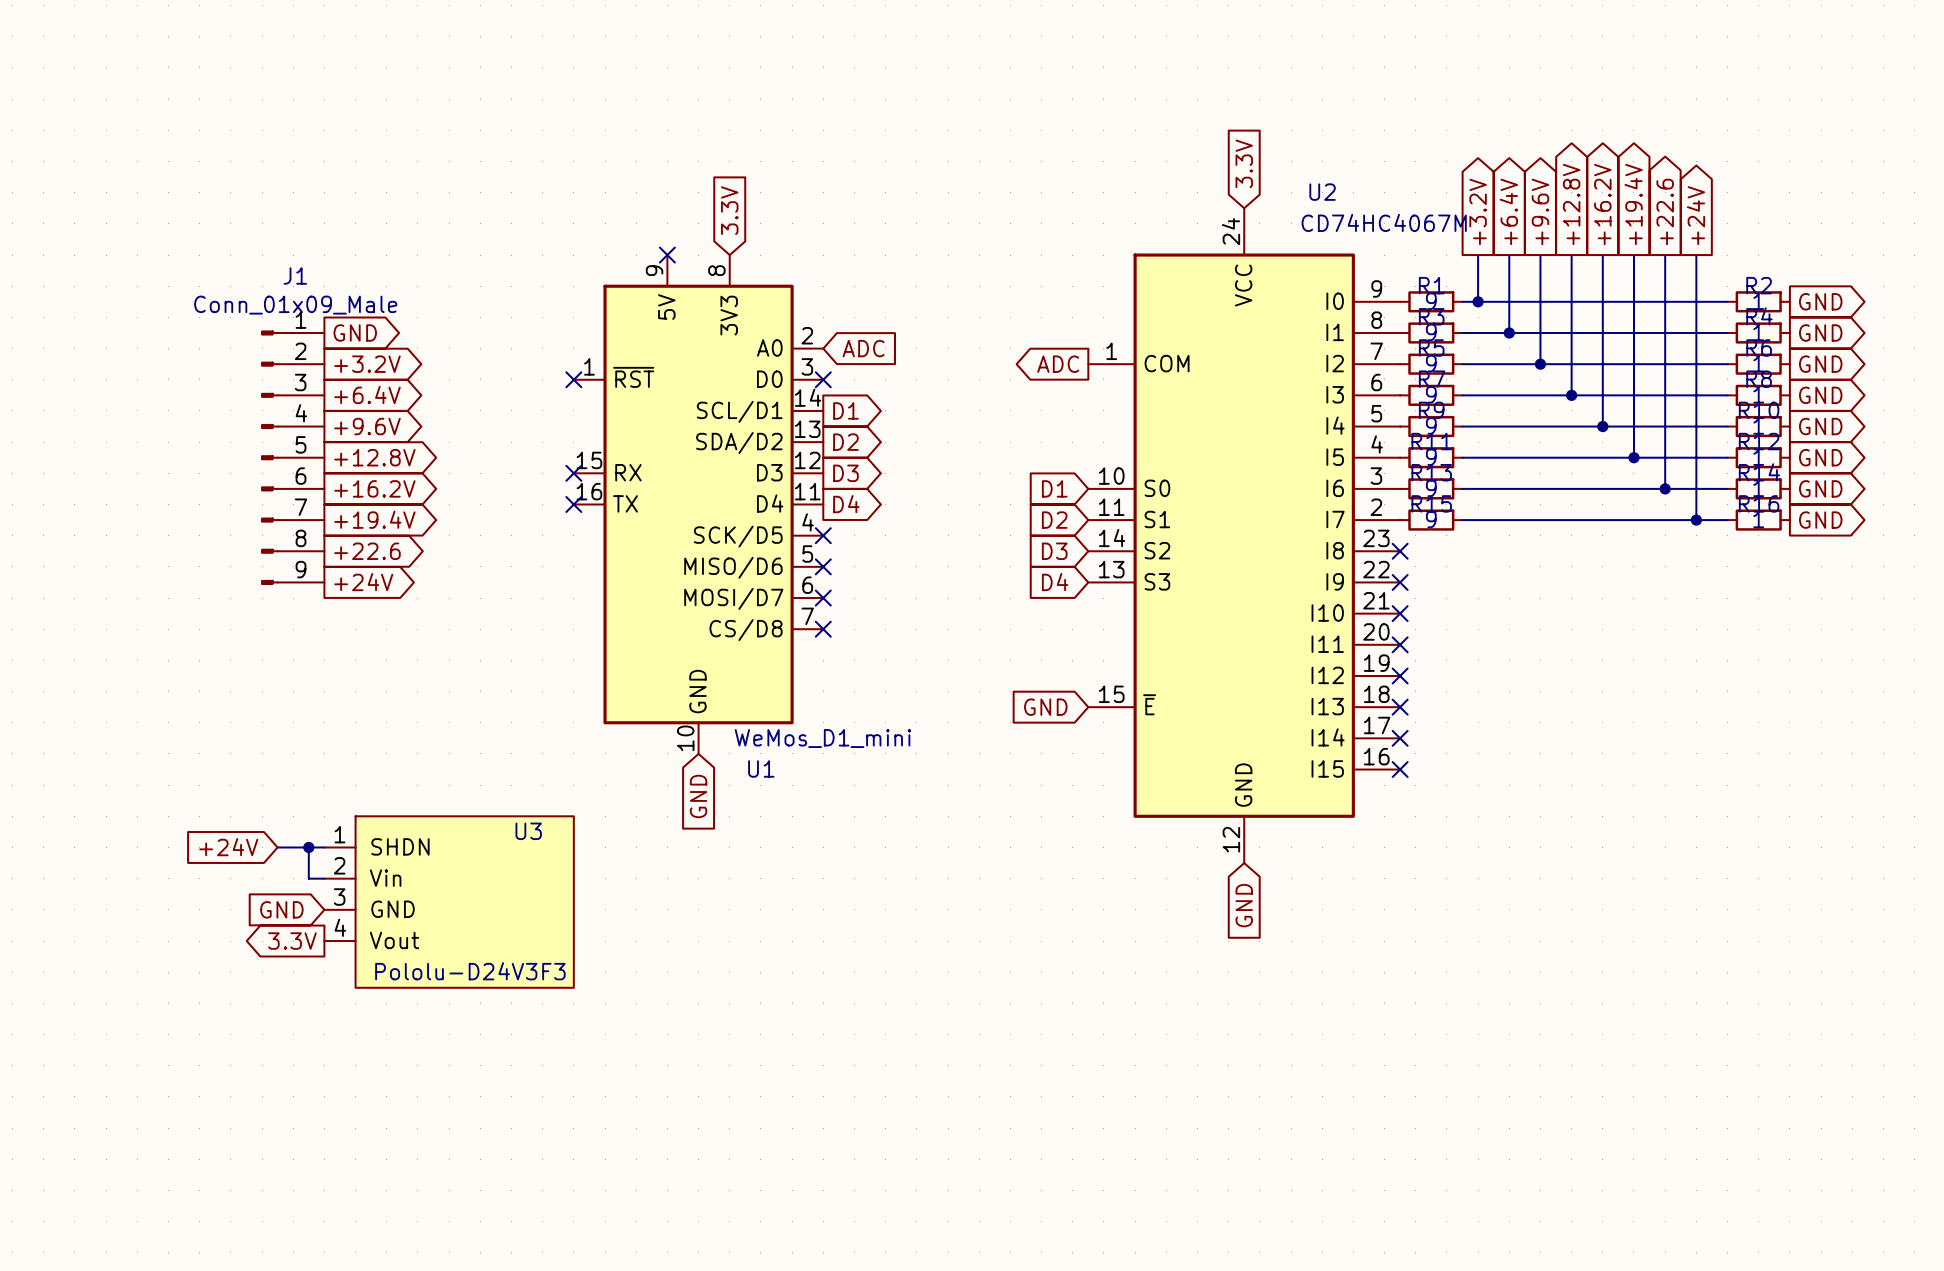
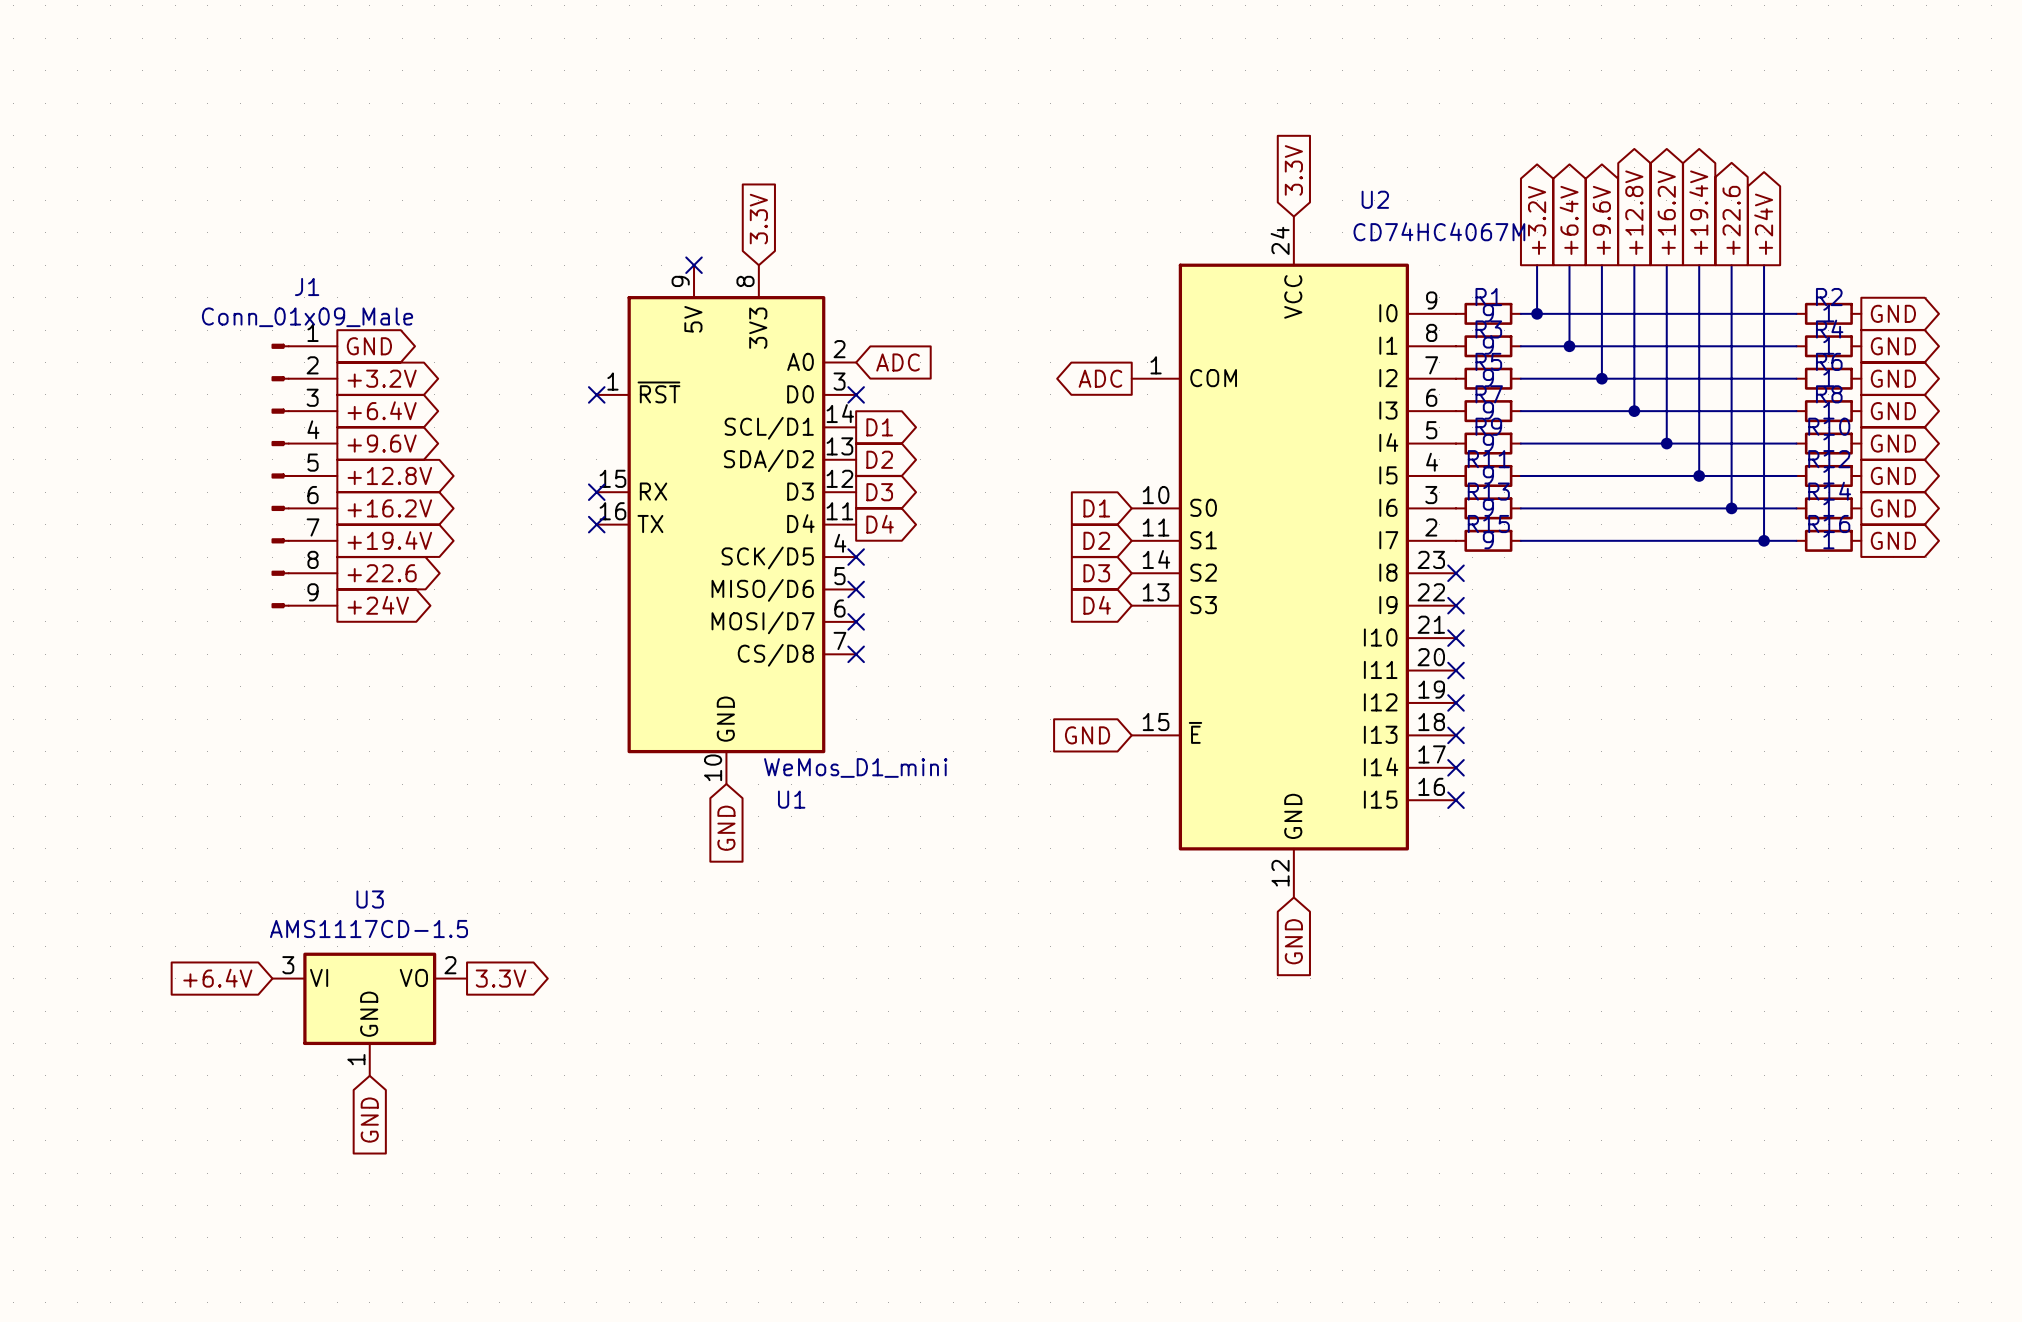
U3 symbol: [324, 816, 574, 988] -> [272, 952, 468, 1076]
U3 name position: U3 (528, 831) -> U3 (370, 899)
global label: +24V (228, 847) -> none
wire: (277, 847) (324, 847) -> none
wire: (308, 847) (308, 878) (324, 878) -> none
junction: (308, 847) -> none
global label rotation: 0° (281, 909) -> 90° counterclockwise (369, 1120)
global label position: GND (281, 909) -> GND (369, 1120)
global label: none -> +6.4V (217, 978)
global label rotation: 0° (292, 941) -> 180° (501, 978)
global label position: 3.3V (292, 941) -> 3.3V (501, 978)
U3 value: Pololu-D24V3F3 (470, 971) -> AMS1117CD-1.5 (368, 929)

